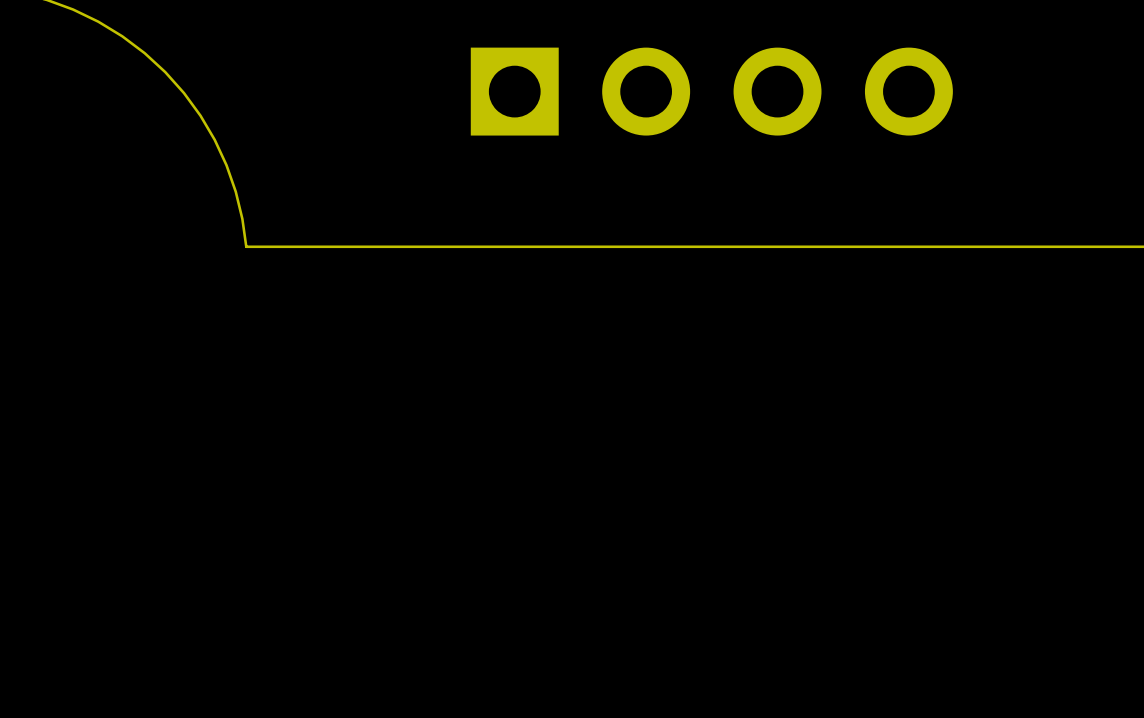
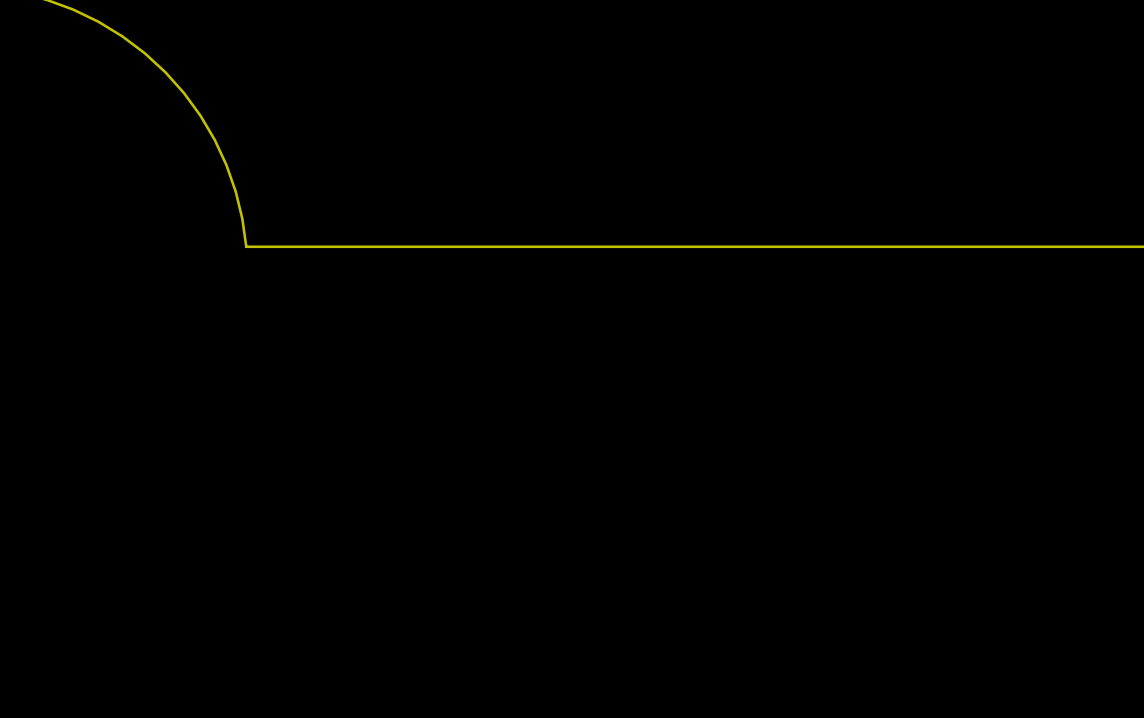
part: (711, 91) -> none

